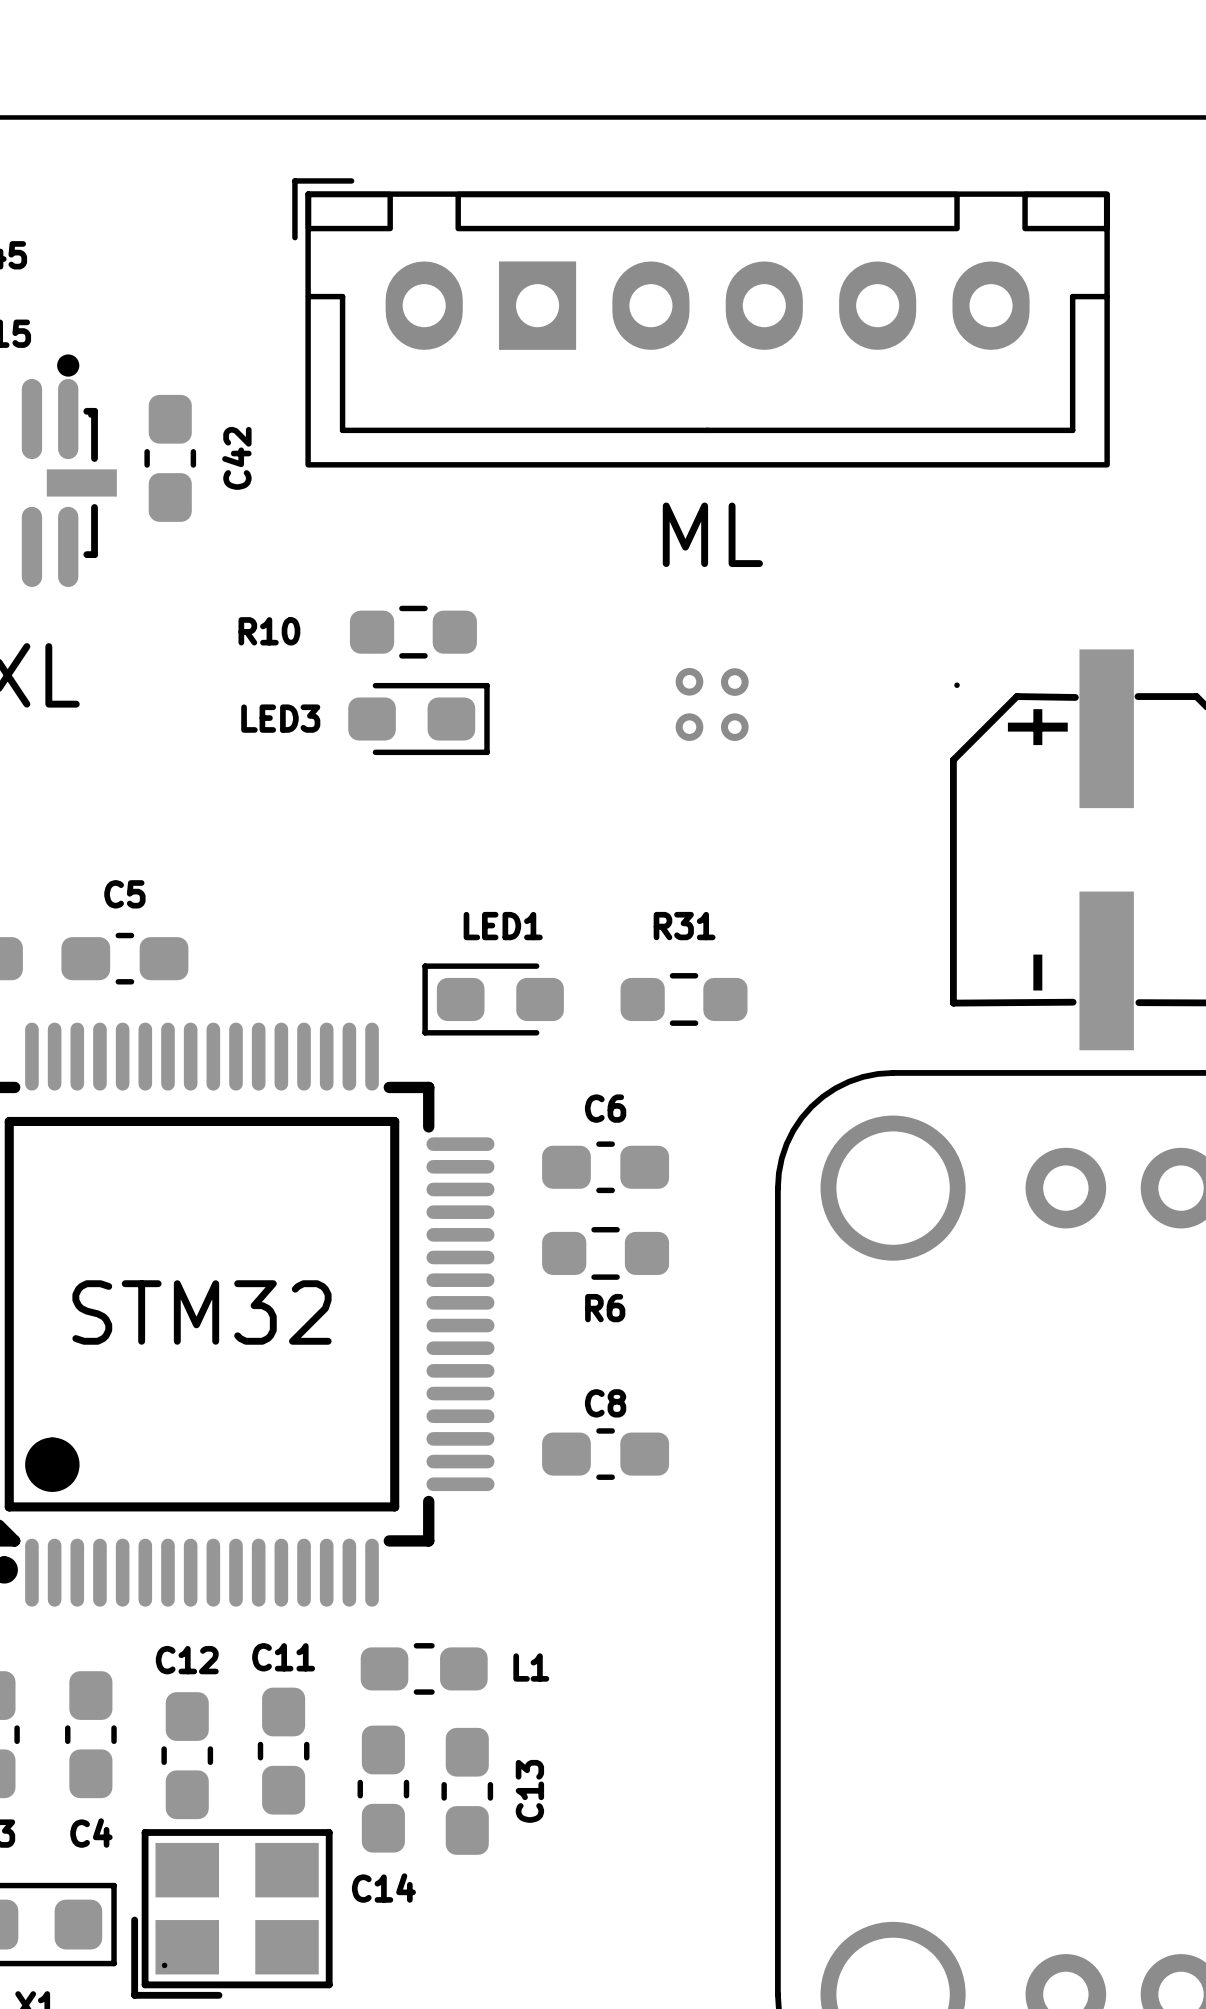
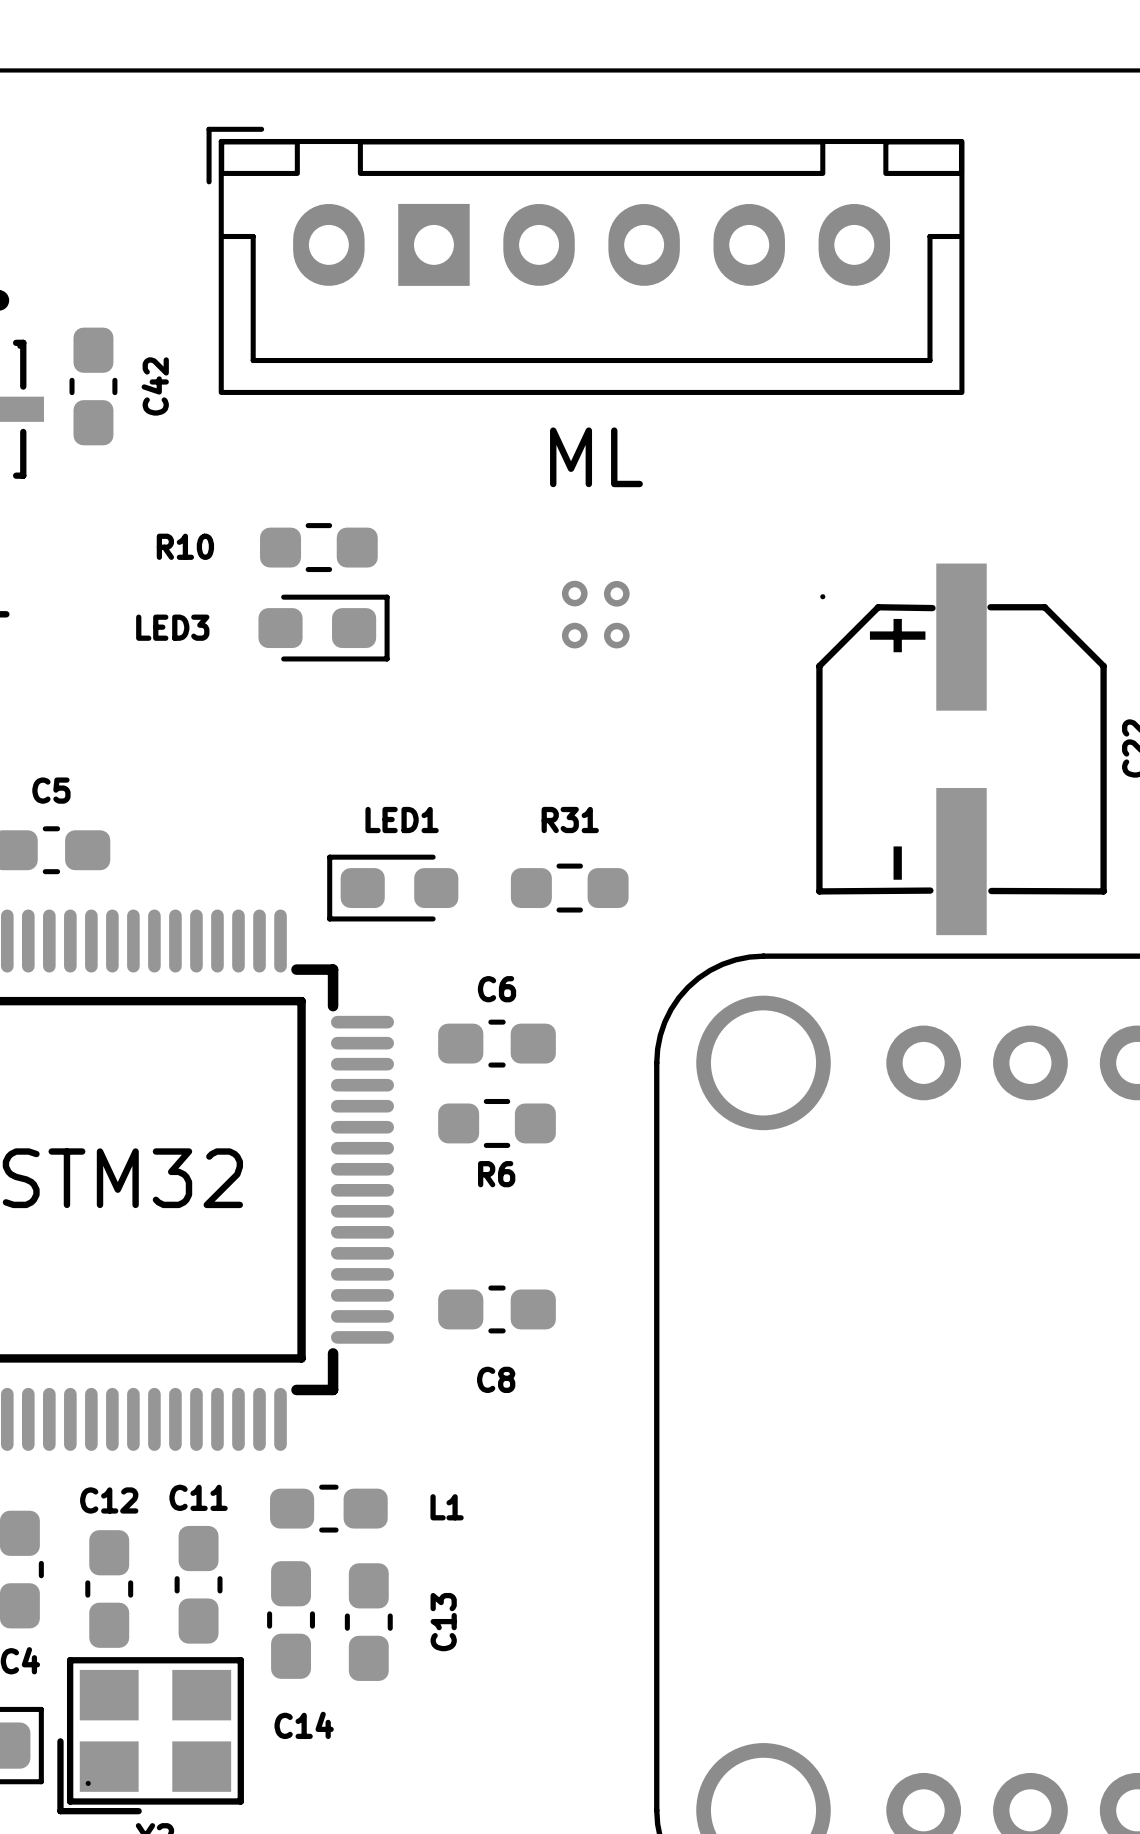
LED3 name position: LED3 (280, 718) -> LED3 (172, 627)
C8 name position: C8 (605, 1403) -> C8 (496, 1379)
L1 name position: L1 (531, 1667) -> L1 (447, 1507)
C13 name position: C13 (529, 1791) -> C13 (443, 1622)
C14 name position: C14 (383, 1888) -> C14 (304, 1725)

